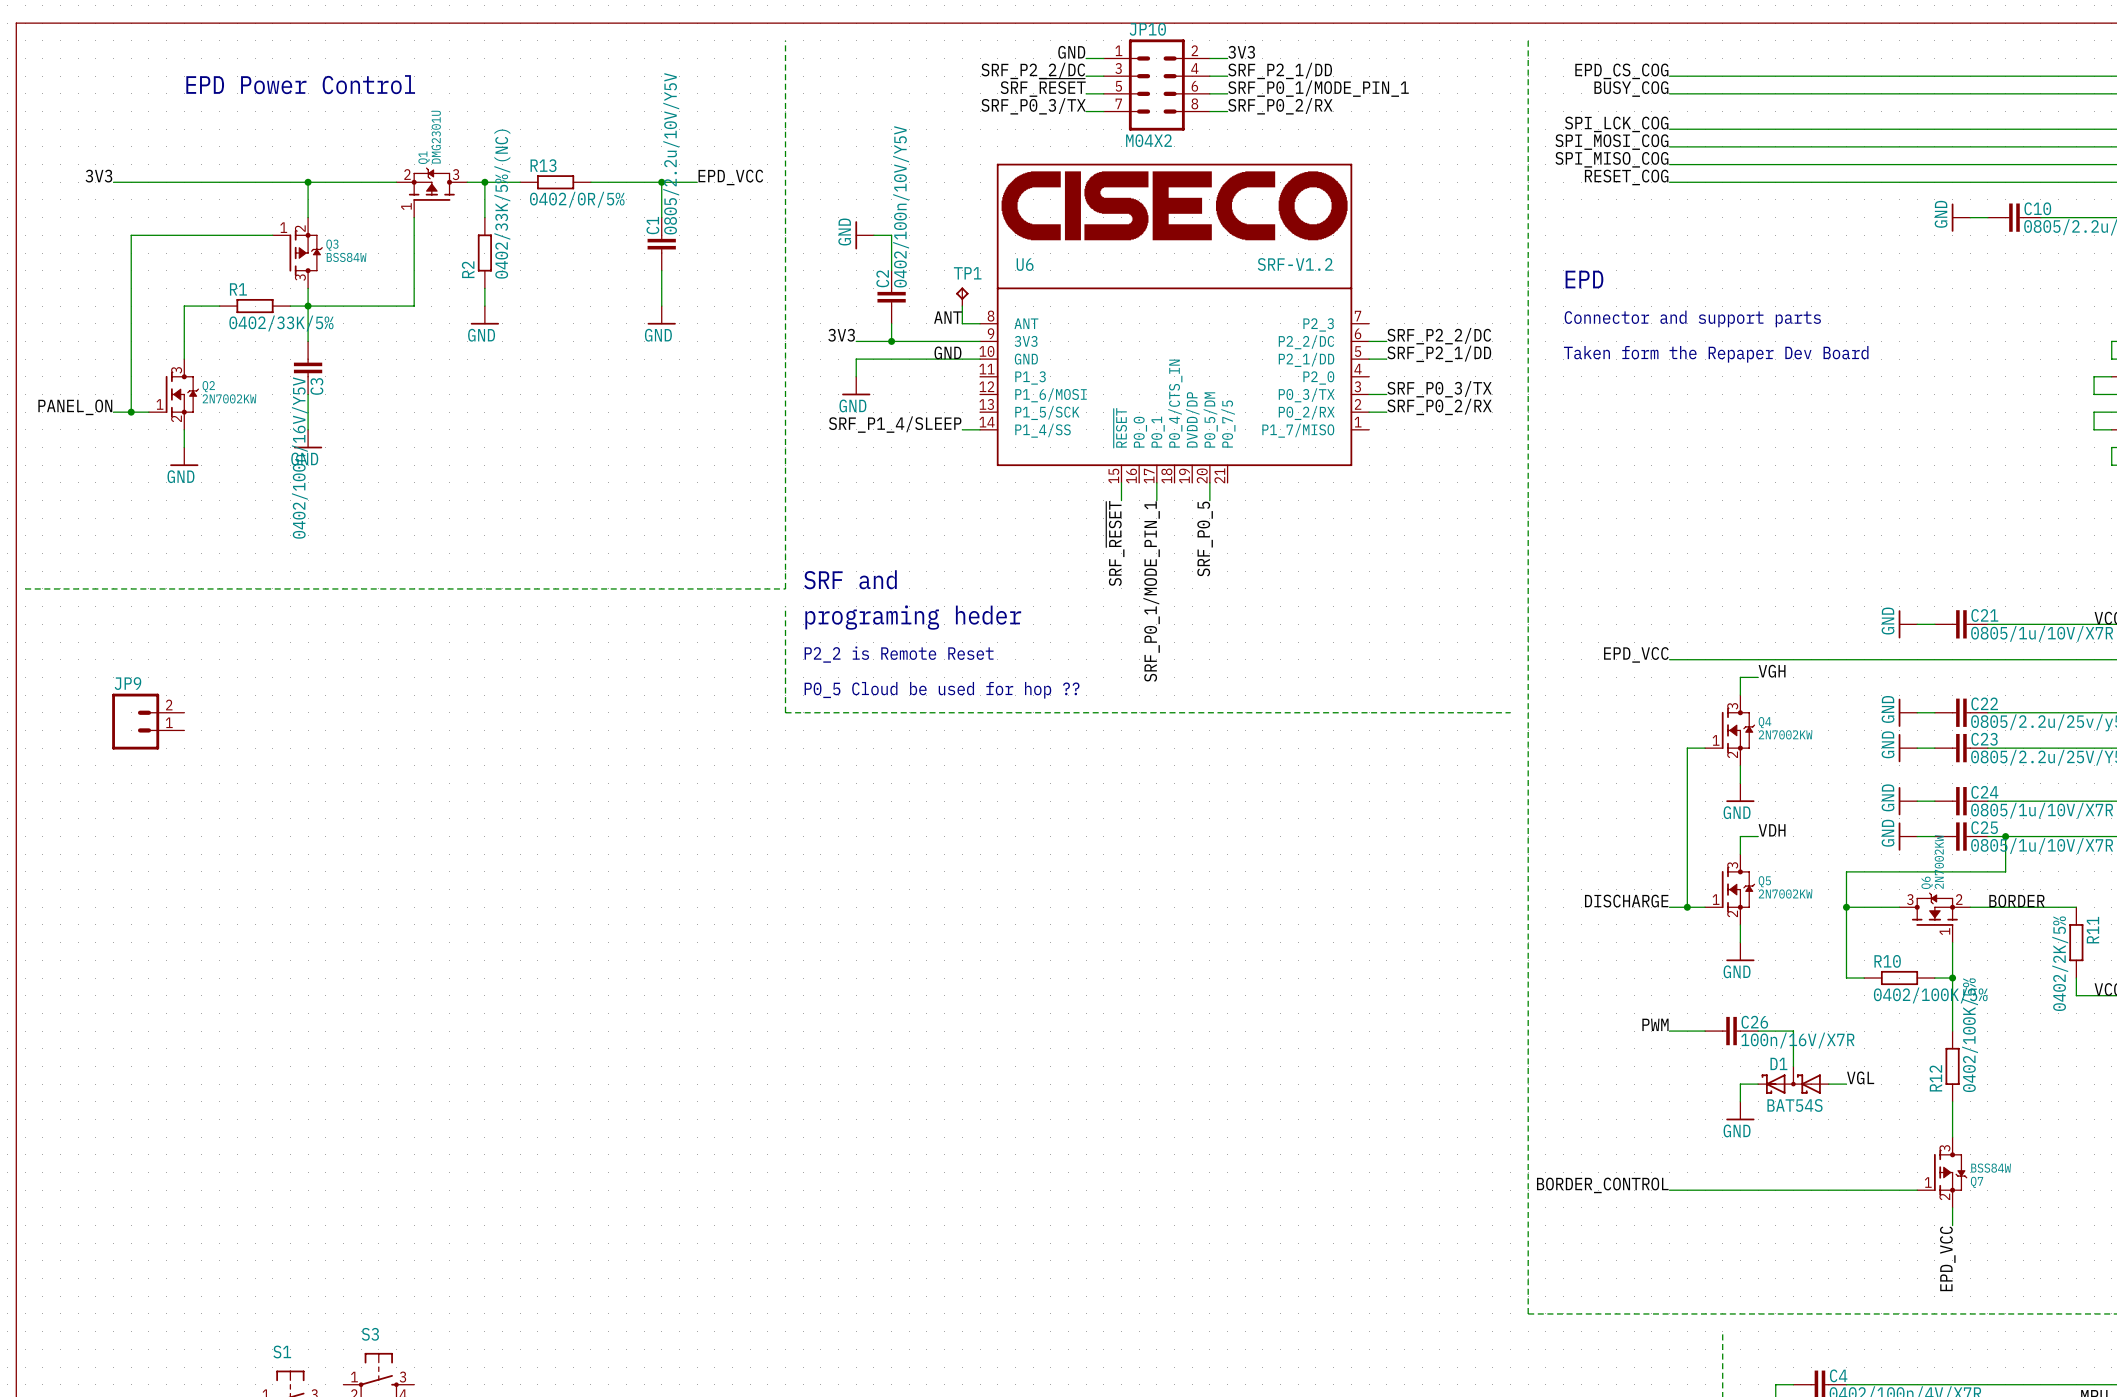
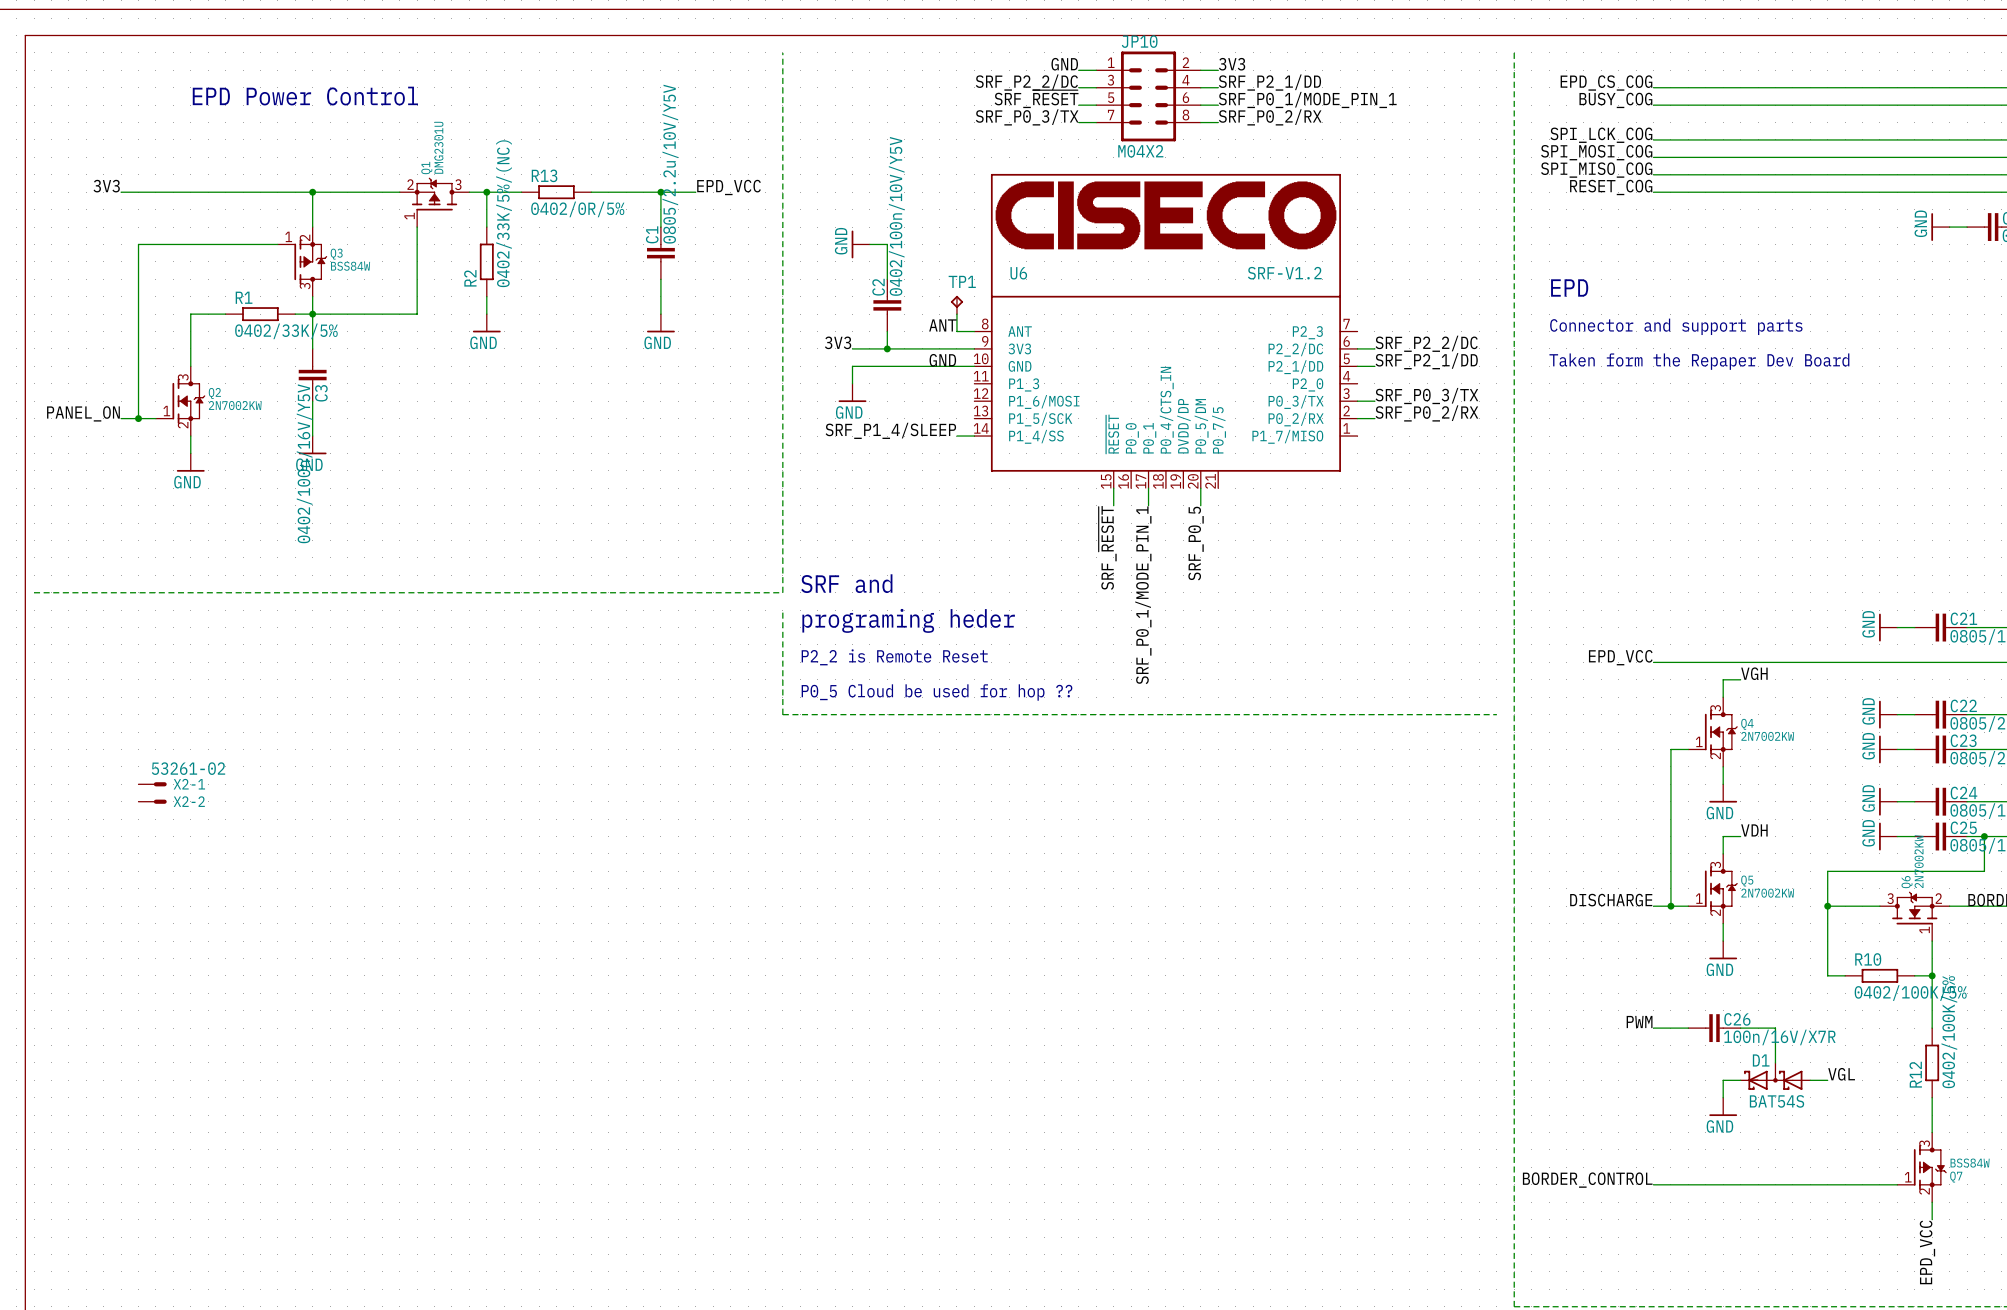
JP9: (148, 721) -> none
X2-1: none -> 53261-02 (152, 784)
X2-2: none -> (152, 801)

